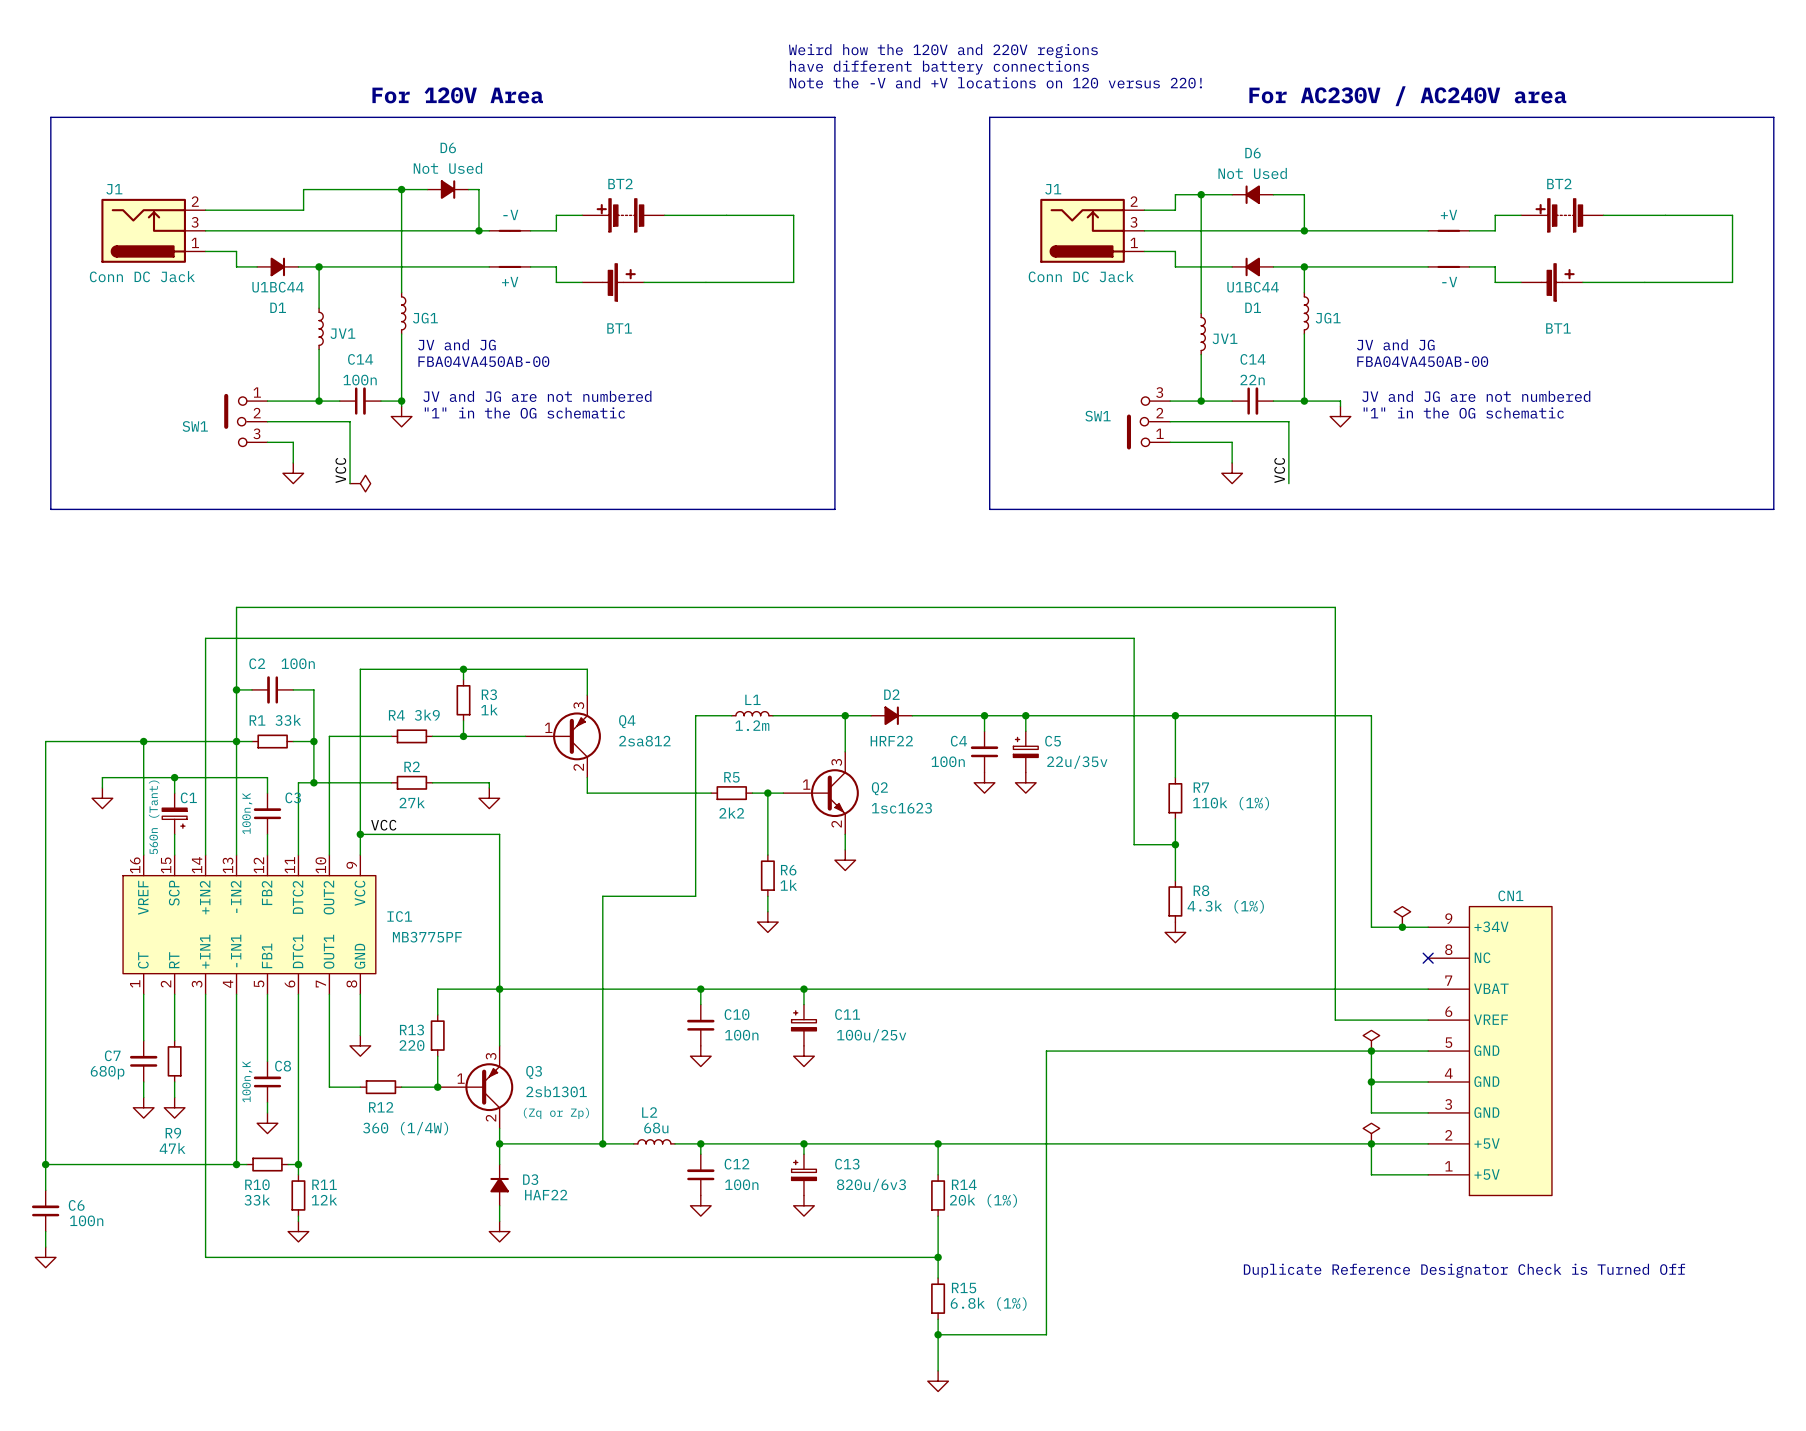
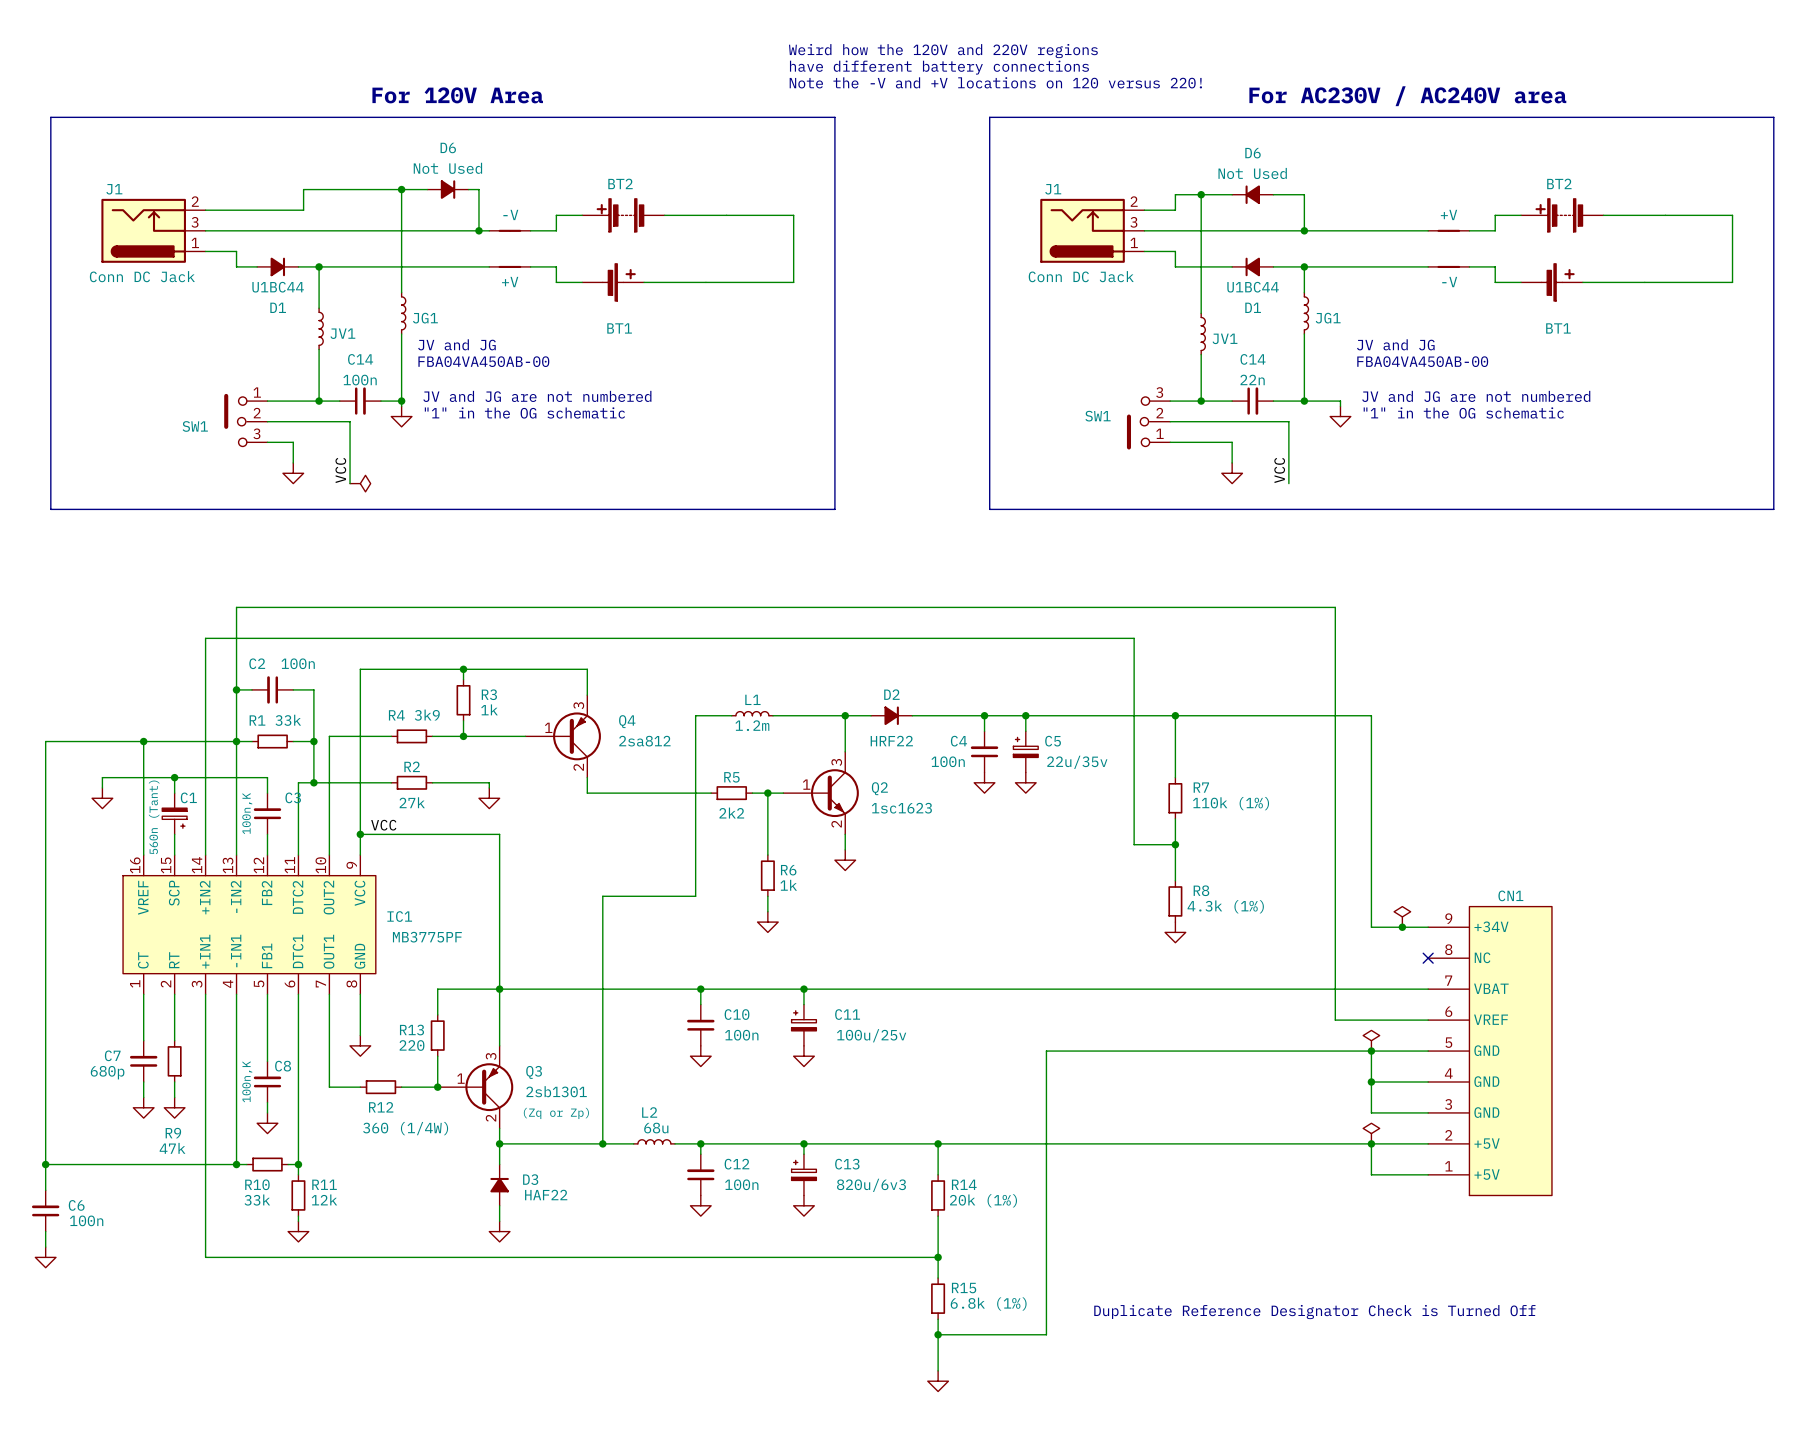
text position: Duplicate Reference Designator Check is Turned Off (1464, 1270) -> Duplicate Reference Designator Check is Turned Off (1314, 1312)

